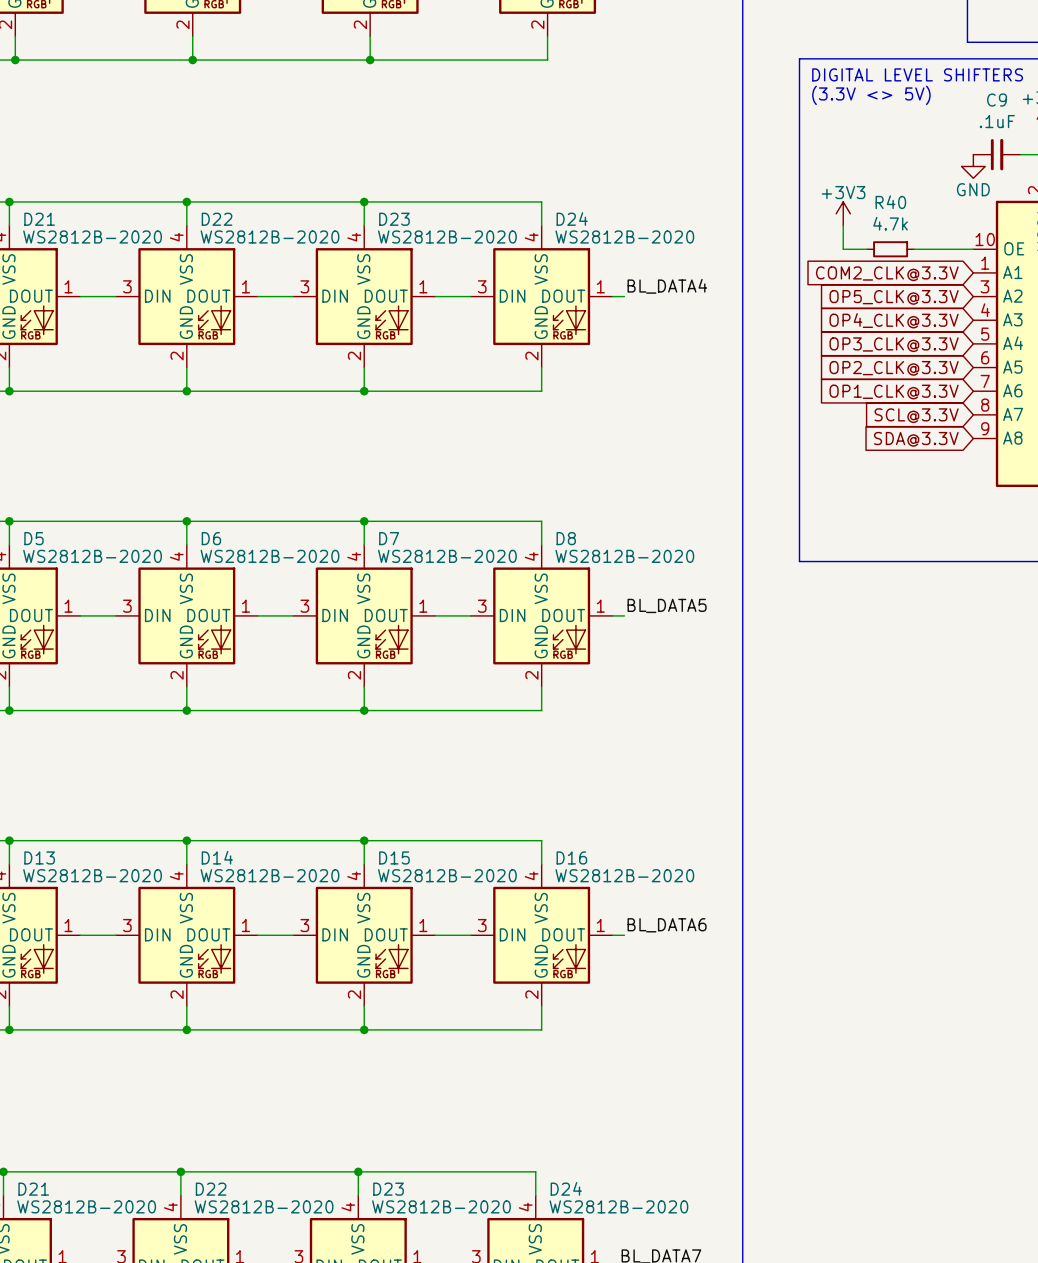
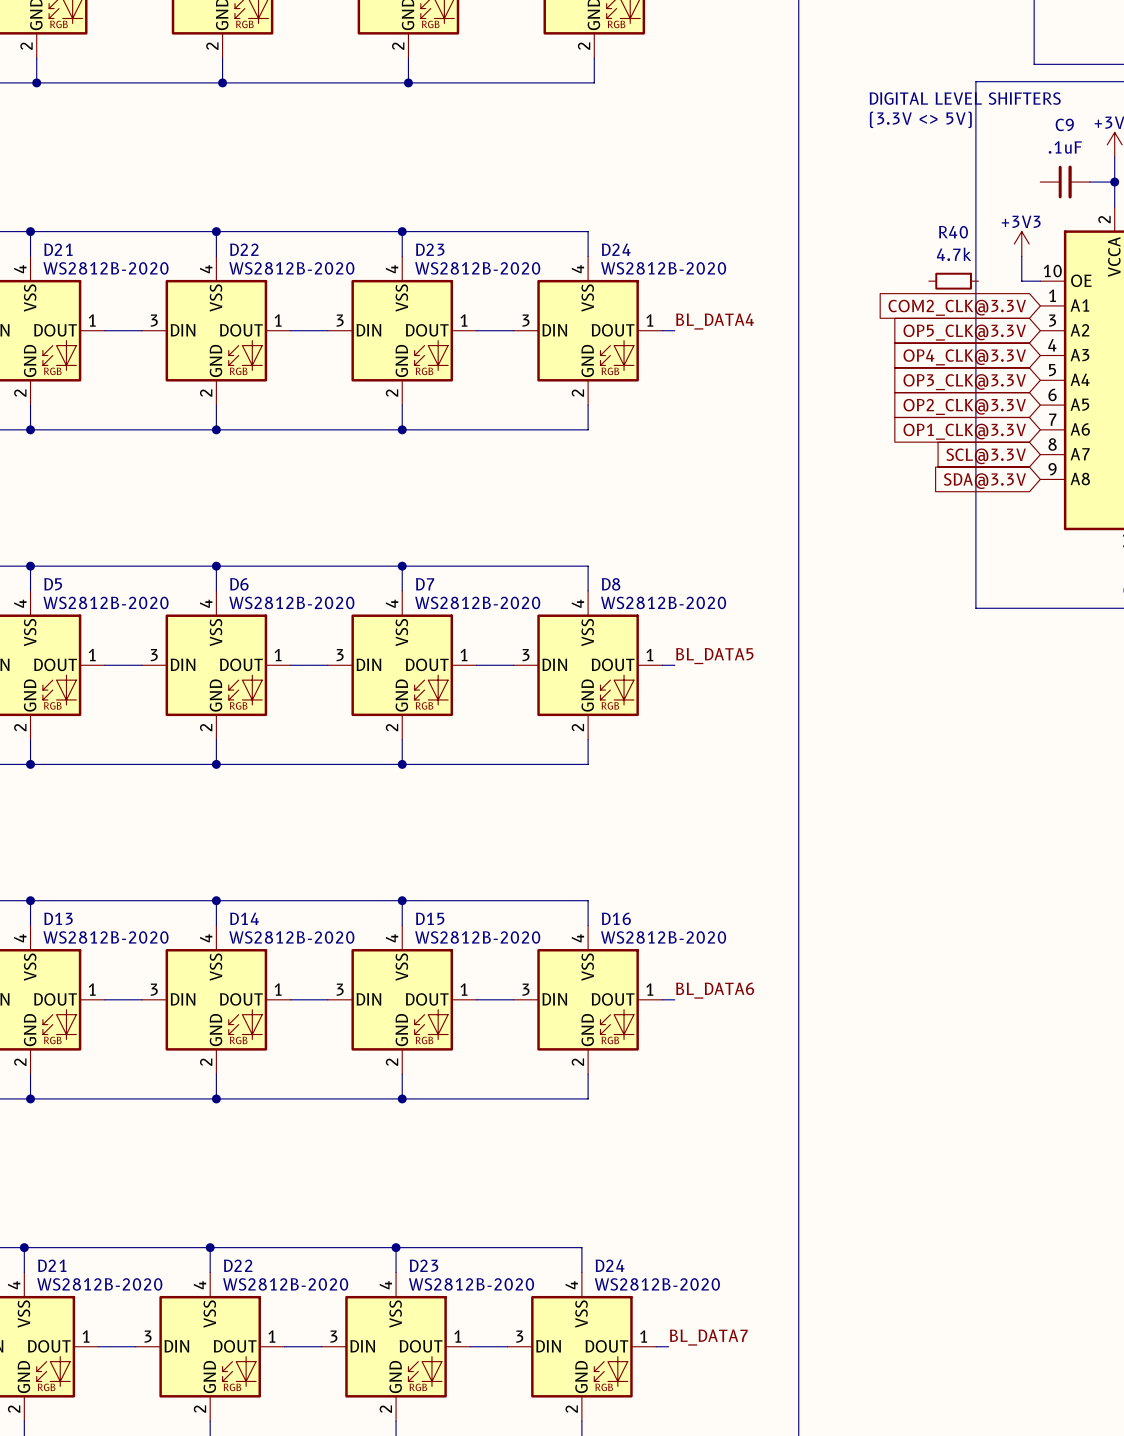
line: (911, 58) (799, 58) (799, 561) (911, 561) -> (975, 81) (975, 608)
power symbol: GND (973, 166) -> none
power symbol position: +3V3 (843, 213) -> +3V3 (1021, 243)
wire: (843, 225) (843, 249) (866, 249) -> none
wire: (914, 249) (955, 249) -> (1021, 256) (1021, 281)

